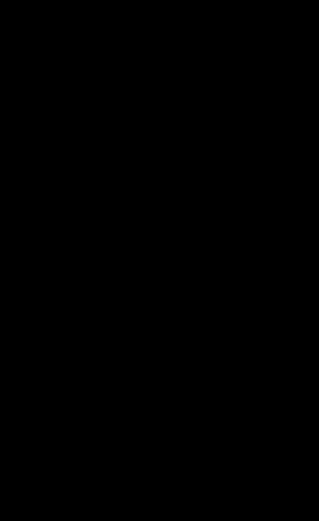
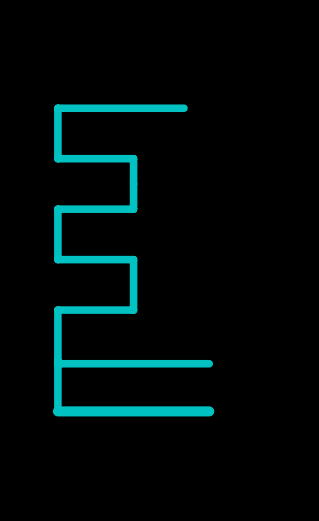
line: none -> (184, 108) (57, 108) (57, 158) (133, 158) (133, 209) (57, 209) (57, 259) (133, 259) (133, 310) (57, 310) (57, 410)
line: none -> (57, 363) (209, 363)
line: none -> (57, 411) (209, 411)

